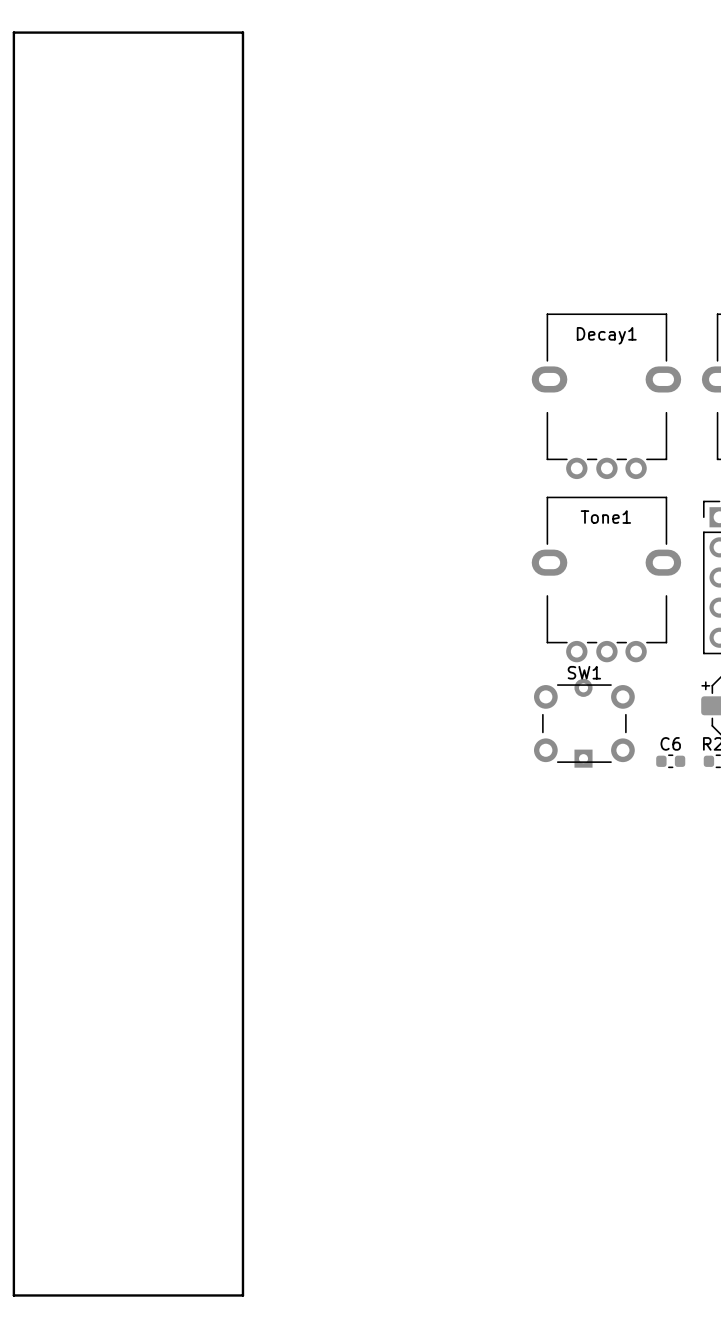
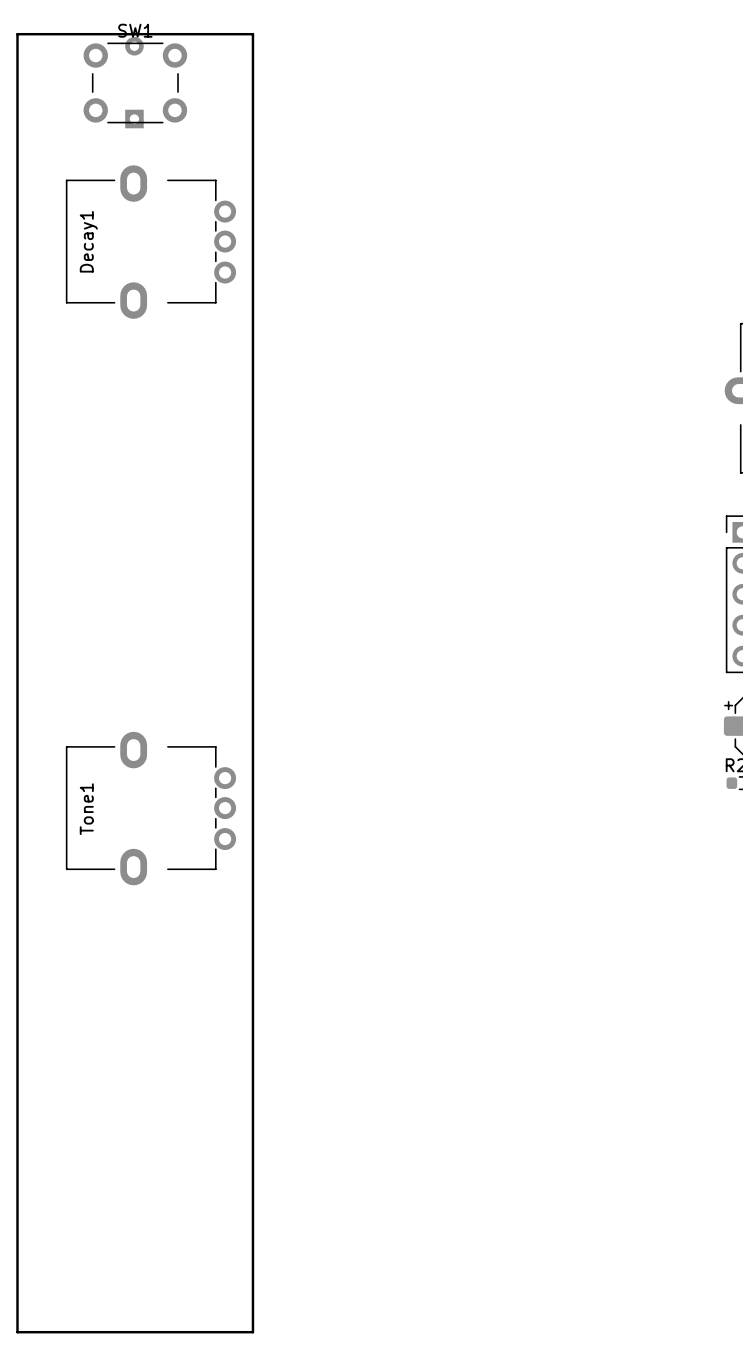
Decay1 rotation: 0° (606, 396) -> 90° counterclockwise (150, 242)
Decay1 position: (606, 396) -> (150, 242)
Tone1 rotation: 0° (606, 579) -> 90° counterclockwise (150, 808)
Tone1 position: (606, 579) -> (150, 808)
SW1 position: (584, 723) -> (135, 82)
C6: (670, 761) -> none

